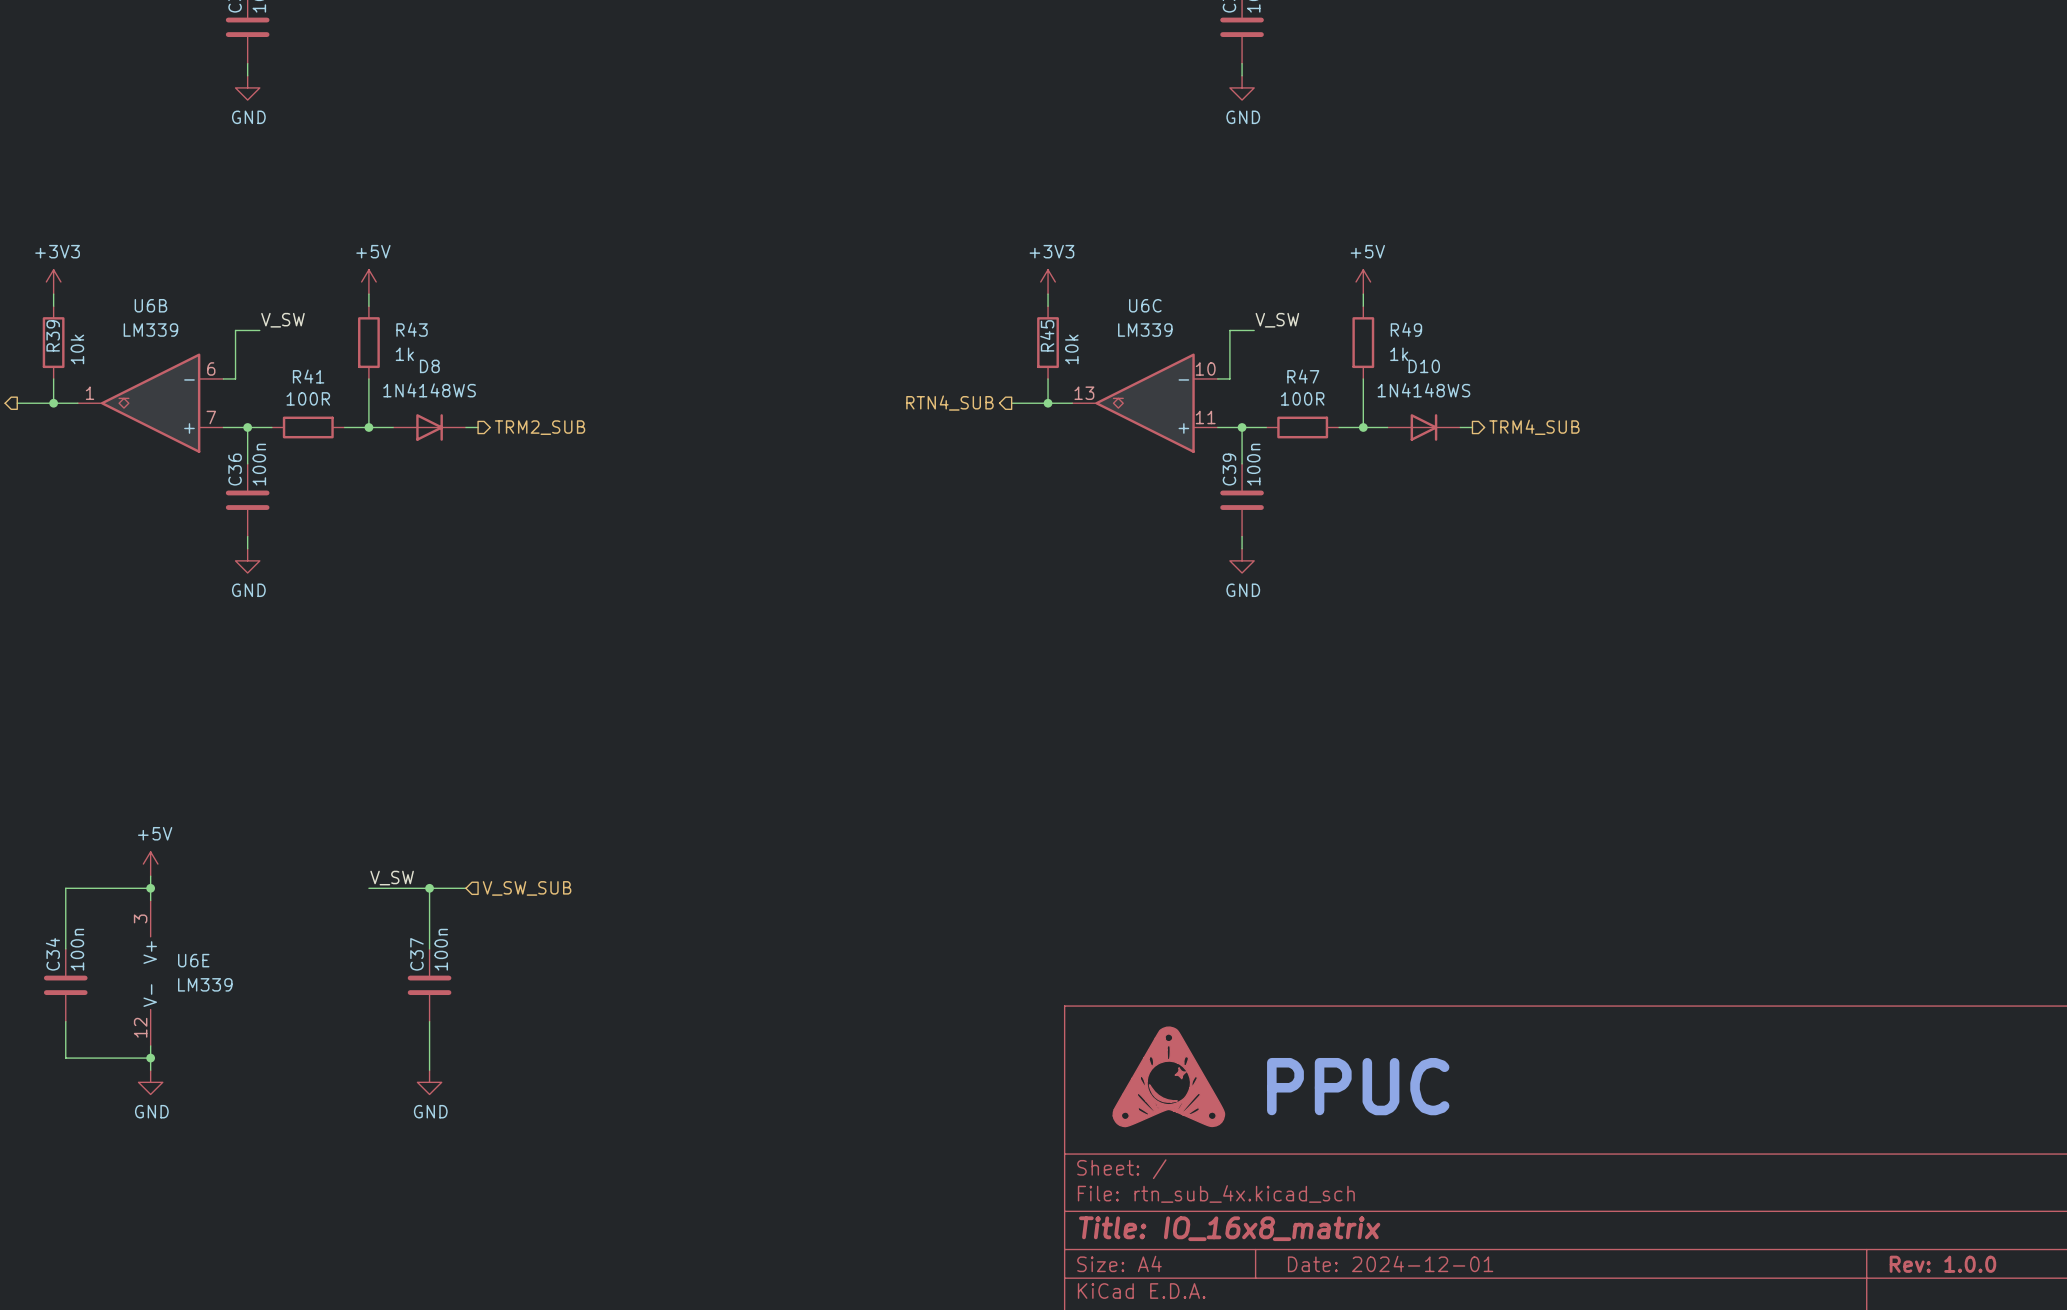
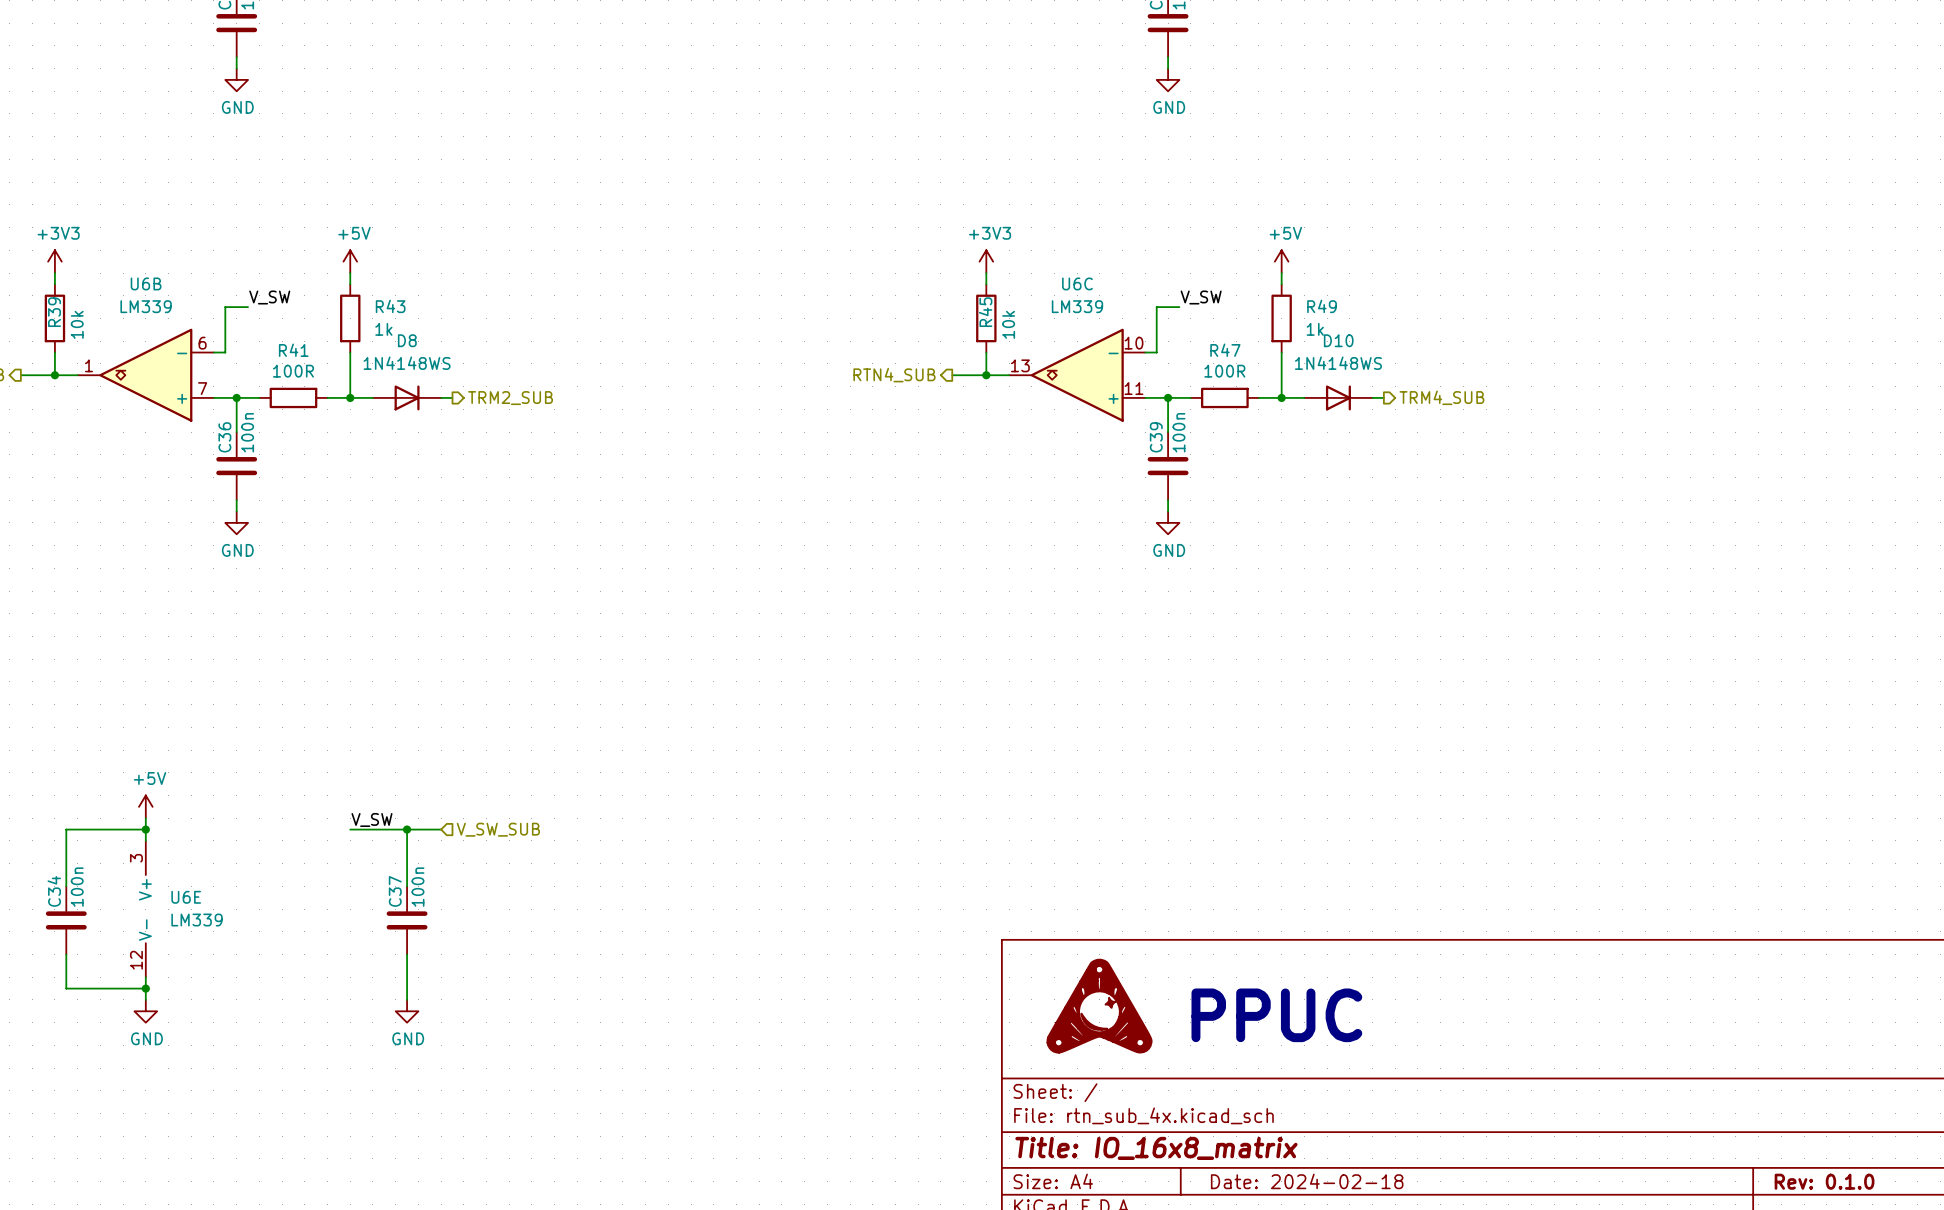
title block: Date: 2024-12-01 (1390, 1263) -> Date: 2024-02-18 (1307, 1181)
title block: Rev: 1.0.0 (1942, 1264) -> Rev: 0.1.0 (1824, 1181)

